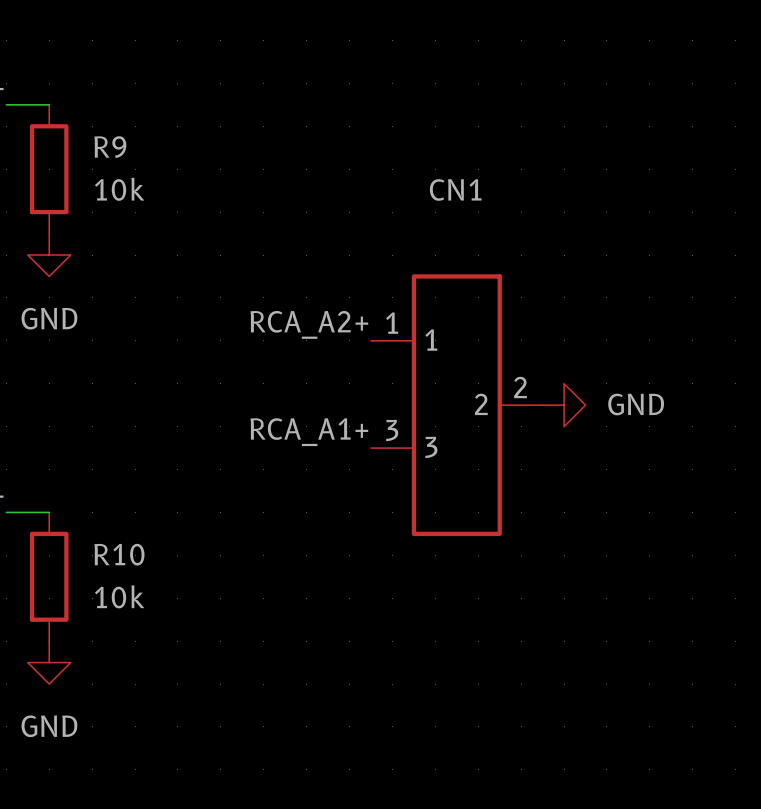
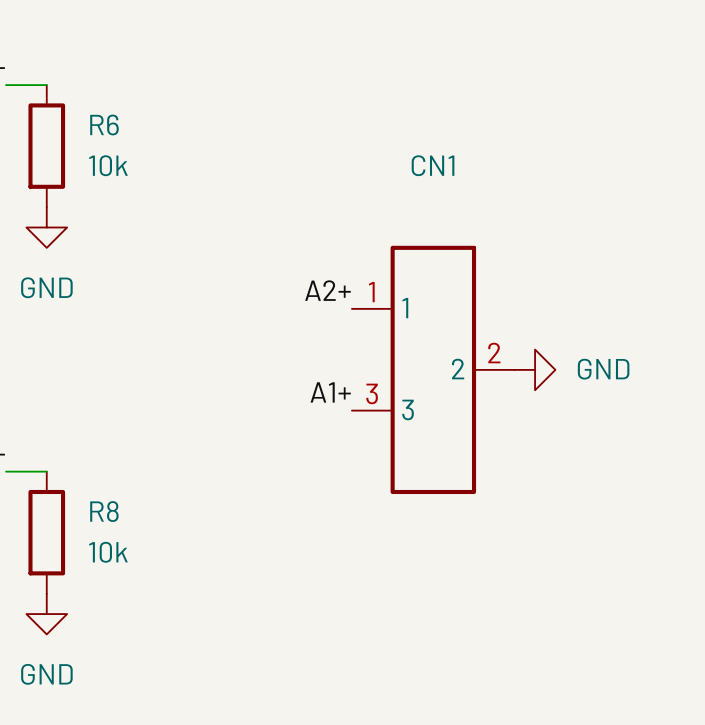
R9 name: R9 (110, 147) -> R6 (104, 124)
label: RCA_A2+ (309, 324) -> A2+ (327, 290)
label: RCA_A1+ (309, 432) -> A1+ (330, 392)
R10 name: R10 (119, 554) -> R8 (104, 511)

